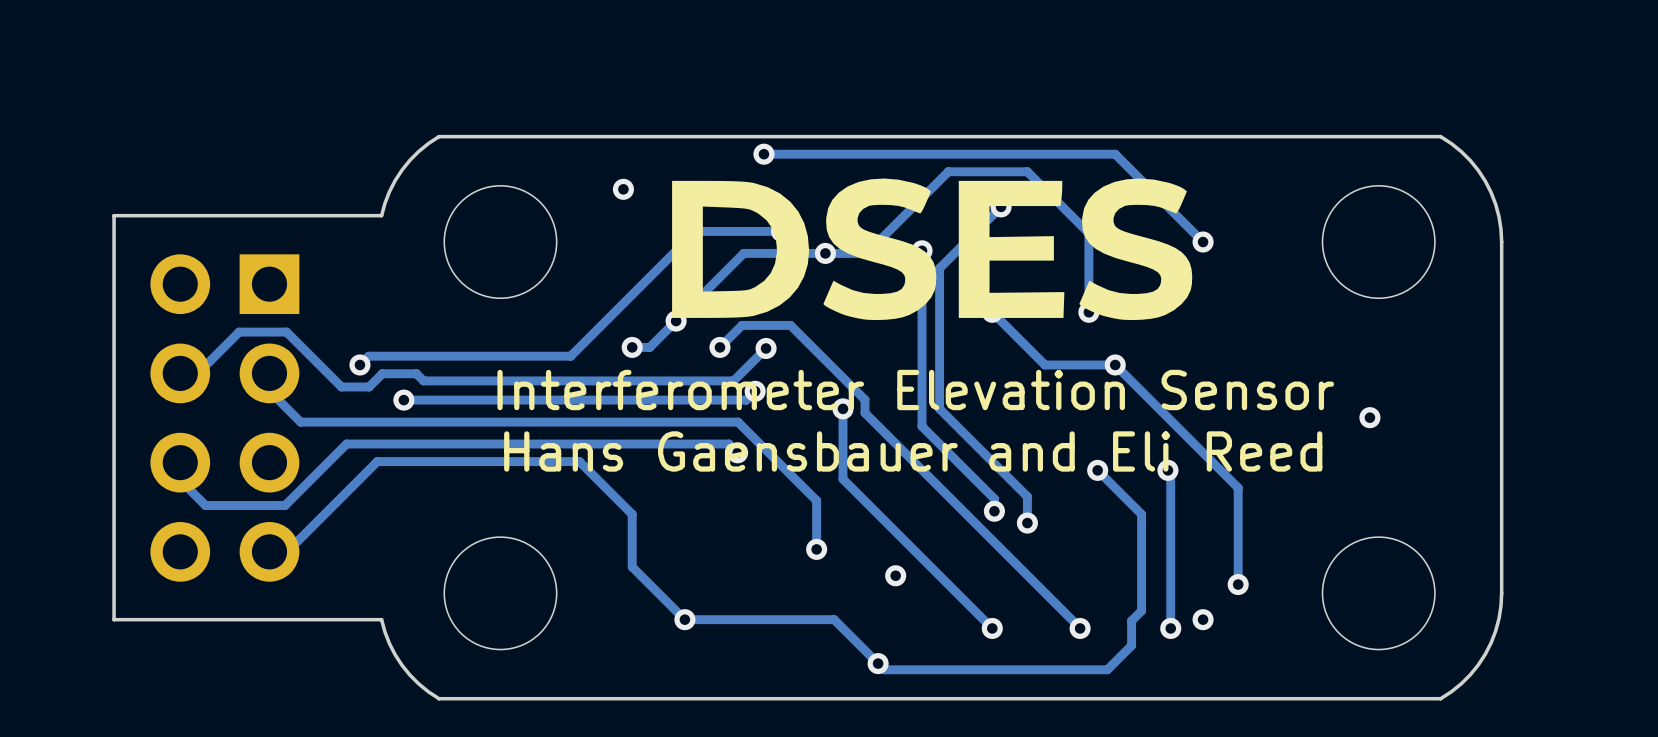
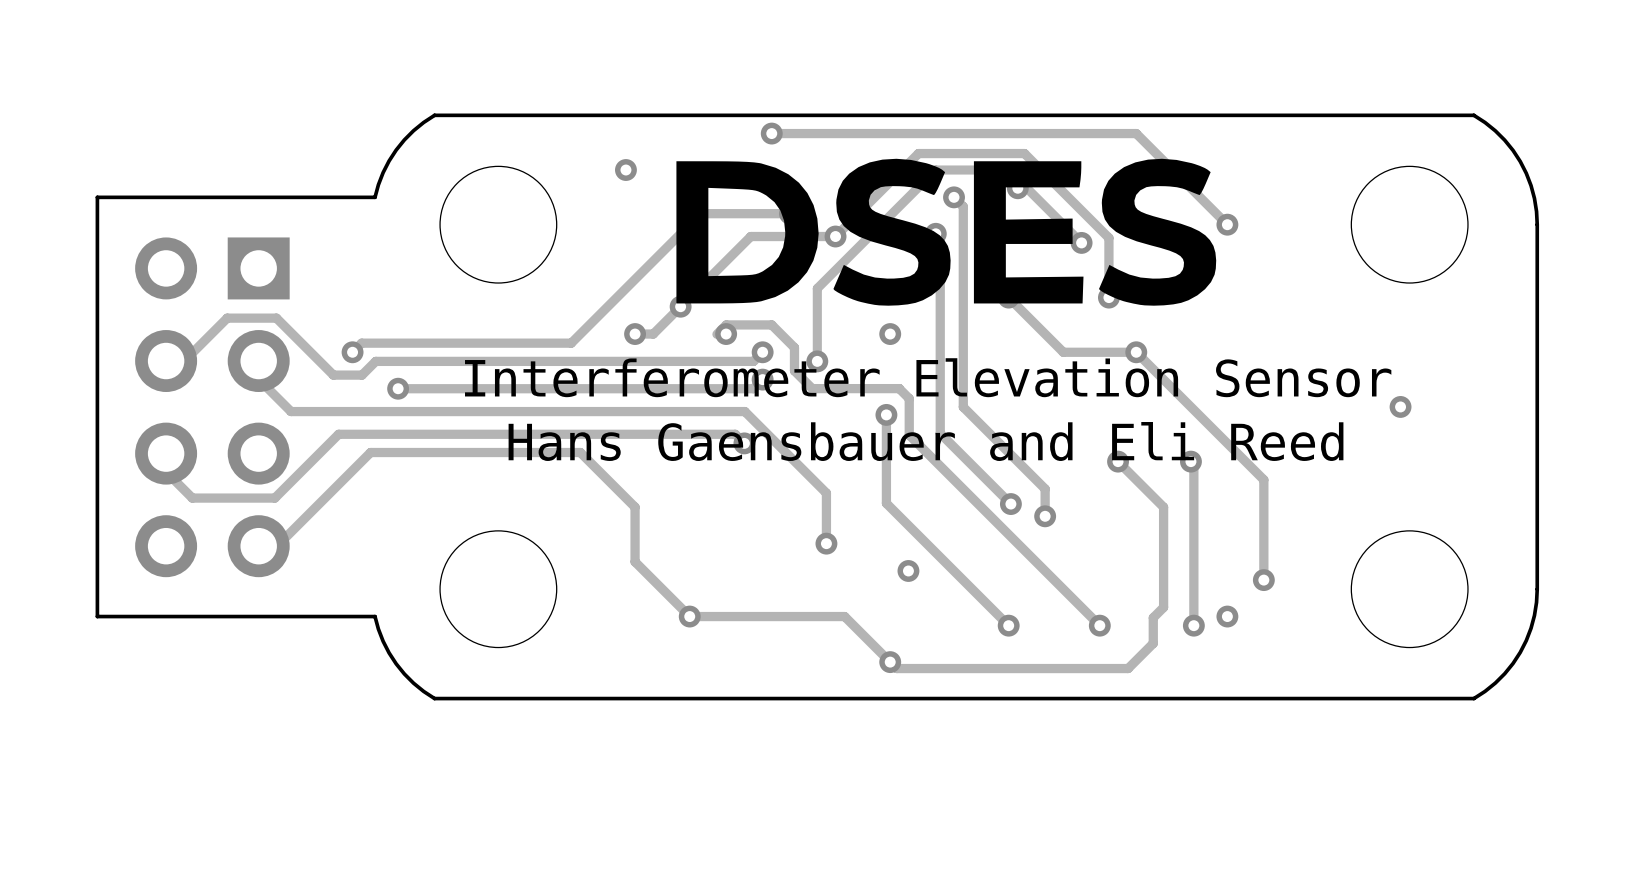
track: (1001, 206) (939, 268) (939, 408) (948, 417) -> (954, 197) (963, 206) (963, 407)
via: none -> (954, 197)
track: (922, 250) (922, 426) (994, 498) (994, 511) -> (940, 250) (940, 433) (1010, 504)
track: (825, 253) (866, 253) (948, 171) (1027, 171) (1088, 233) (1088, 254) -> (835, 236) (918, 153) (1024, 153) (1108, 237)
track: none -> (1081, 242) (1008, 170) (935, 170) (817, 288) (817, 361)
via: none -> (1081, 242)
track: (719, 347) (741, 325) (790, 325) (864, 399) (864, 412) (1080, 628) -> (716, 334) (726, 324) (771, 324) (794, 347) (794, 370) (812, 388) (899, 388) (909, 398) (909, 435) (1099, 625)
via: none -> (890, 334)
track: (766, 348) (733, 380) (423, 380) (416, 373) -> (762, 352) (753, 361) (411, 361)
via position: (766, 348) -> (762, 352)
via: none -> (817, 361)
track: (842, 408) (842, 479) (874, 510) -> (886, 414) (886, 503)
via: (842, 408) -> none
via: none -> (886, 414)

